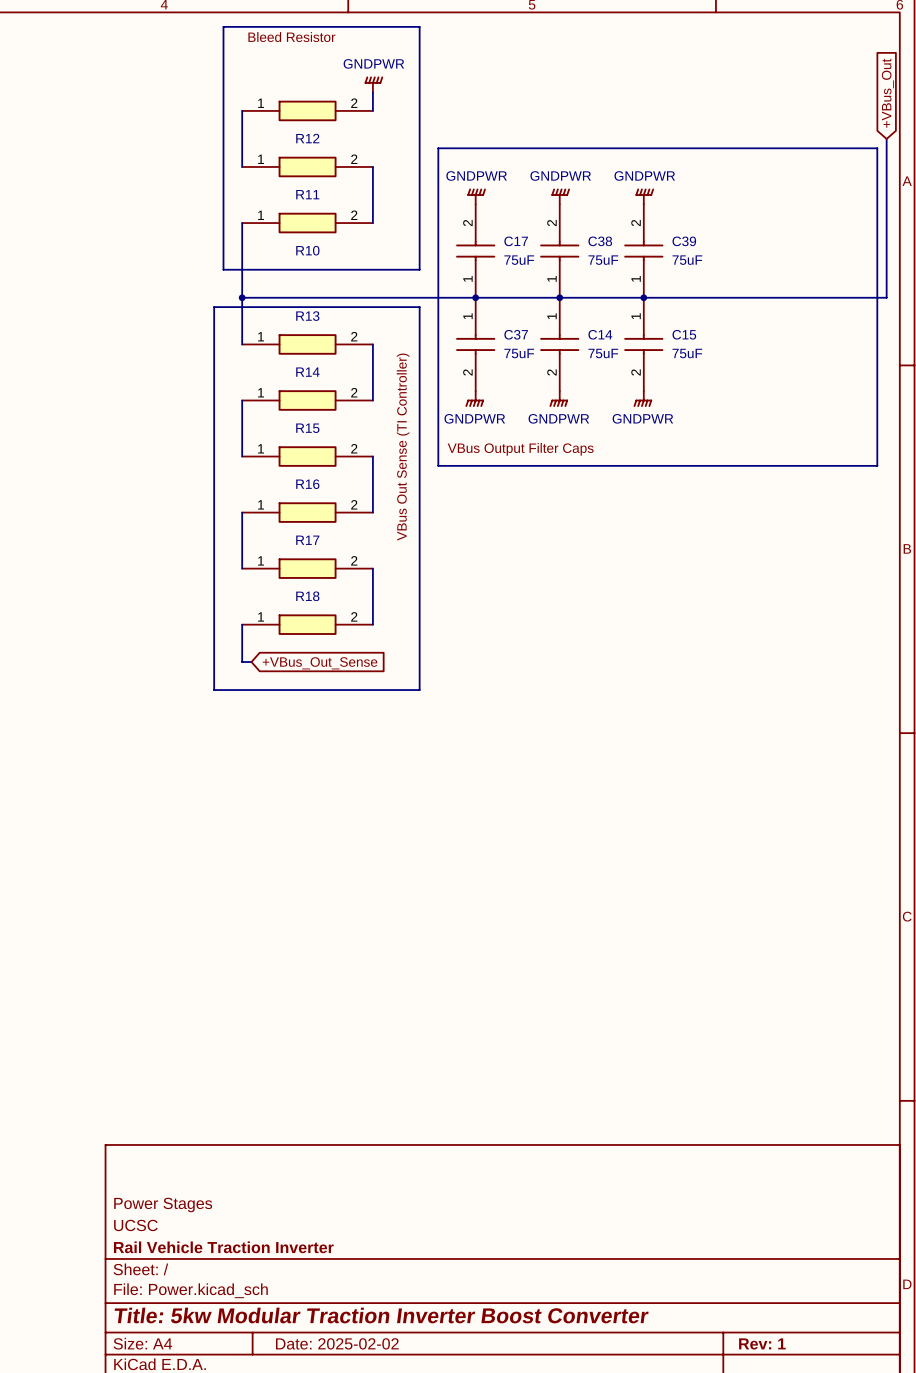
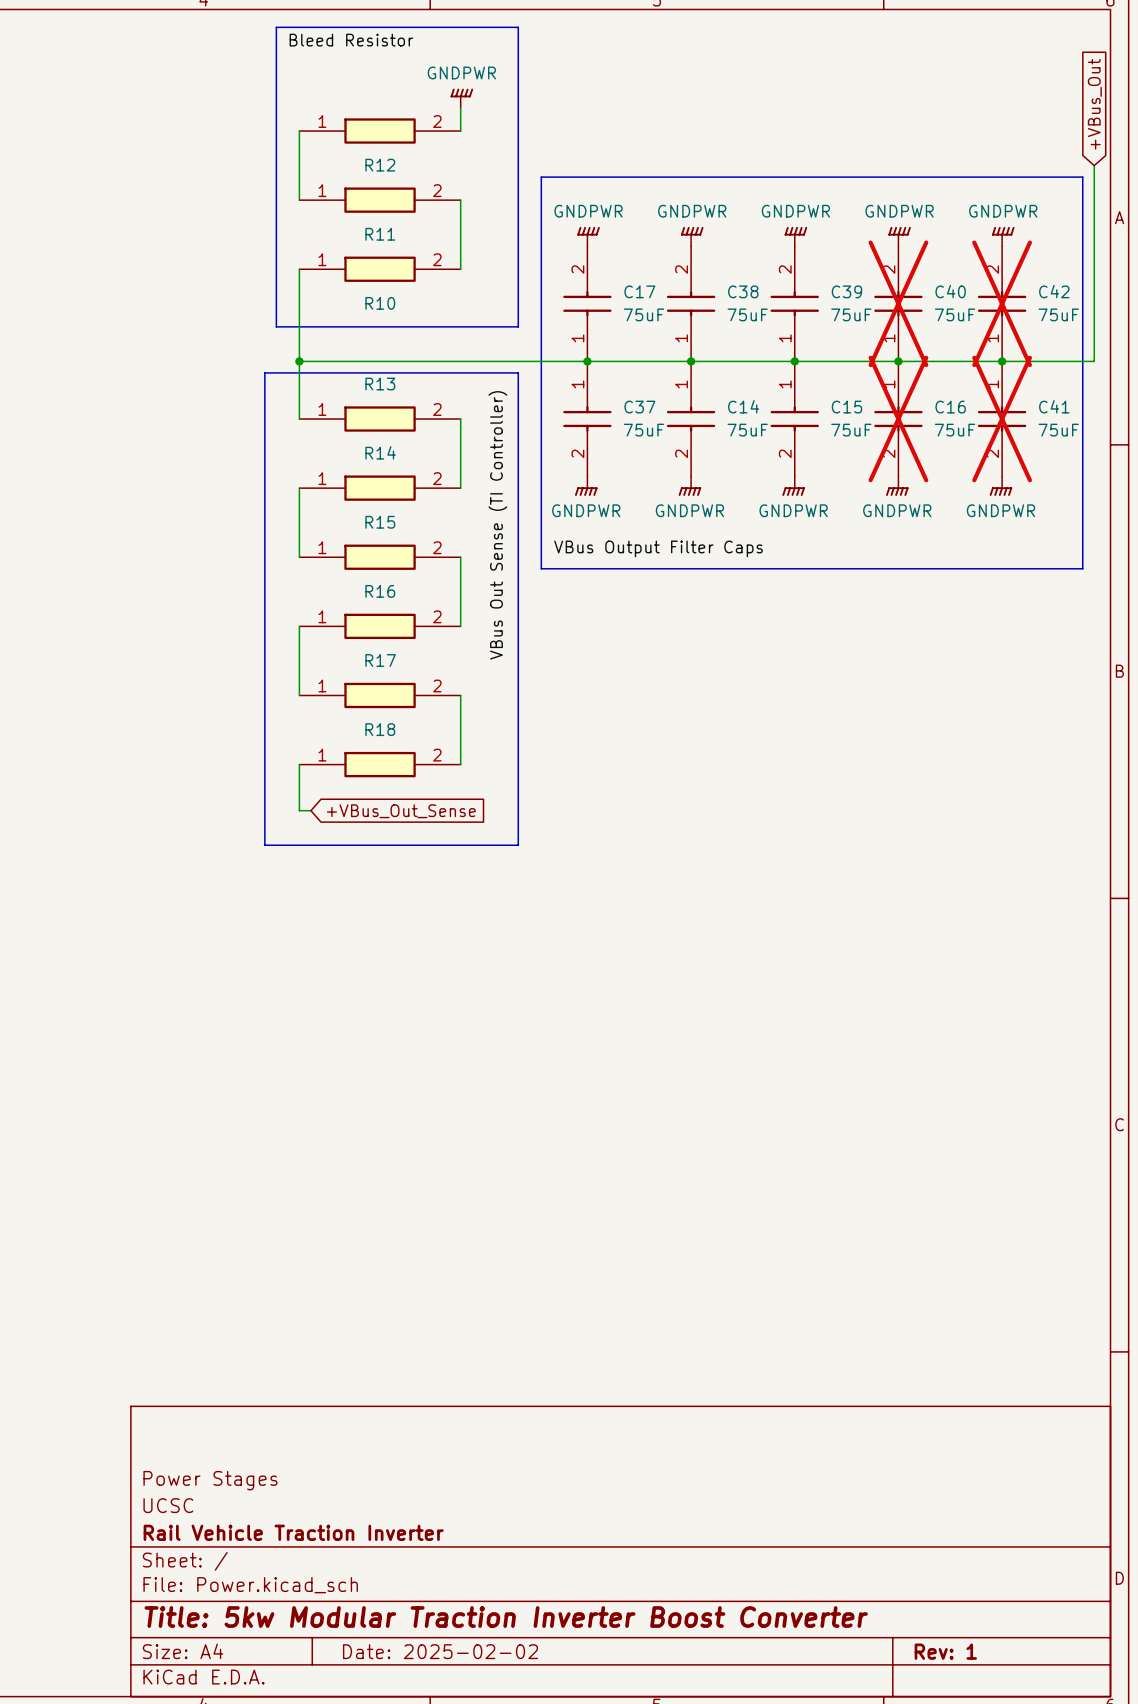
power symbol: none -> GNDPWR (899, 236)
power symbol: none -> GNDPWR (1003, 236)
C40: none -> 75uF (898, 303)
C42: none -> 75uF (1002, 303)
junction: none -> (898, 361)
junction: none -> (1002, 361)
C16: none -> 75uF (898, 419)
C41: none -> 75uF (1002, 419)
power symbol: none -> GNDPWR (897, 486)
power symbol: none -> GNDPWR (1000, 486)

